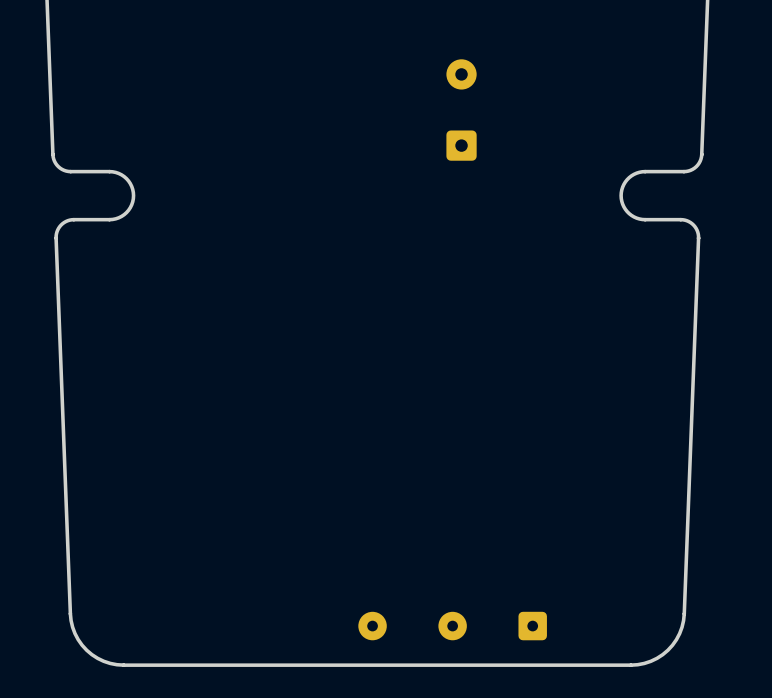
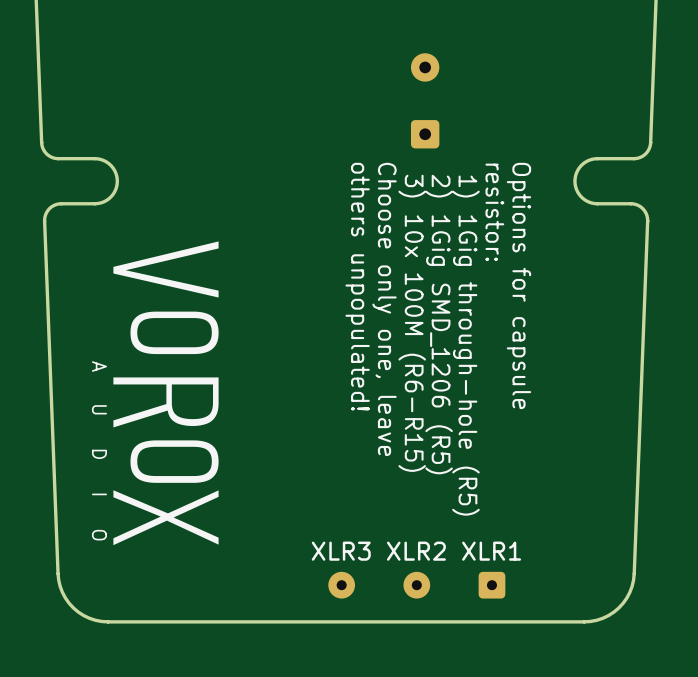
text: none -> resistor: (494, 212)
drawing: none -> [113, 241, 219, 546]
text: none -> others unpopulated! (357, 286)
text: none -> Options for capsule (518, 285)
text: none -> 3) 10x 100M (R6-R15) (412, 323)
text: none -> Choose only one, leave (384, 309)
text: none -> 2) 1Gig SMD_1206 (R5) (439, 324)
text: none -> 1) 1Gig through-hole (R5) (465, 345)
text: none -> A U D I O (99, 450)
text: none -> XLR3 (341, 551)
text: none -> XLR2 (416, 551)
text: none -> XLR1 (491, 551)

